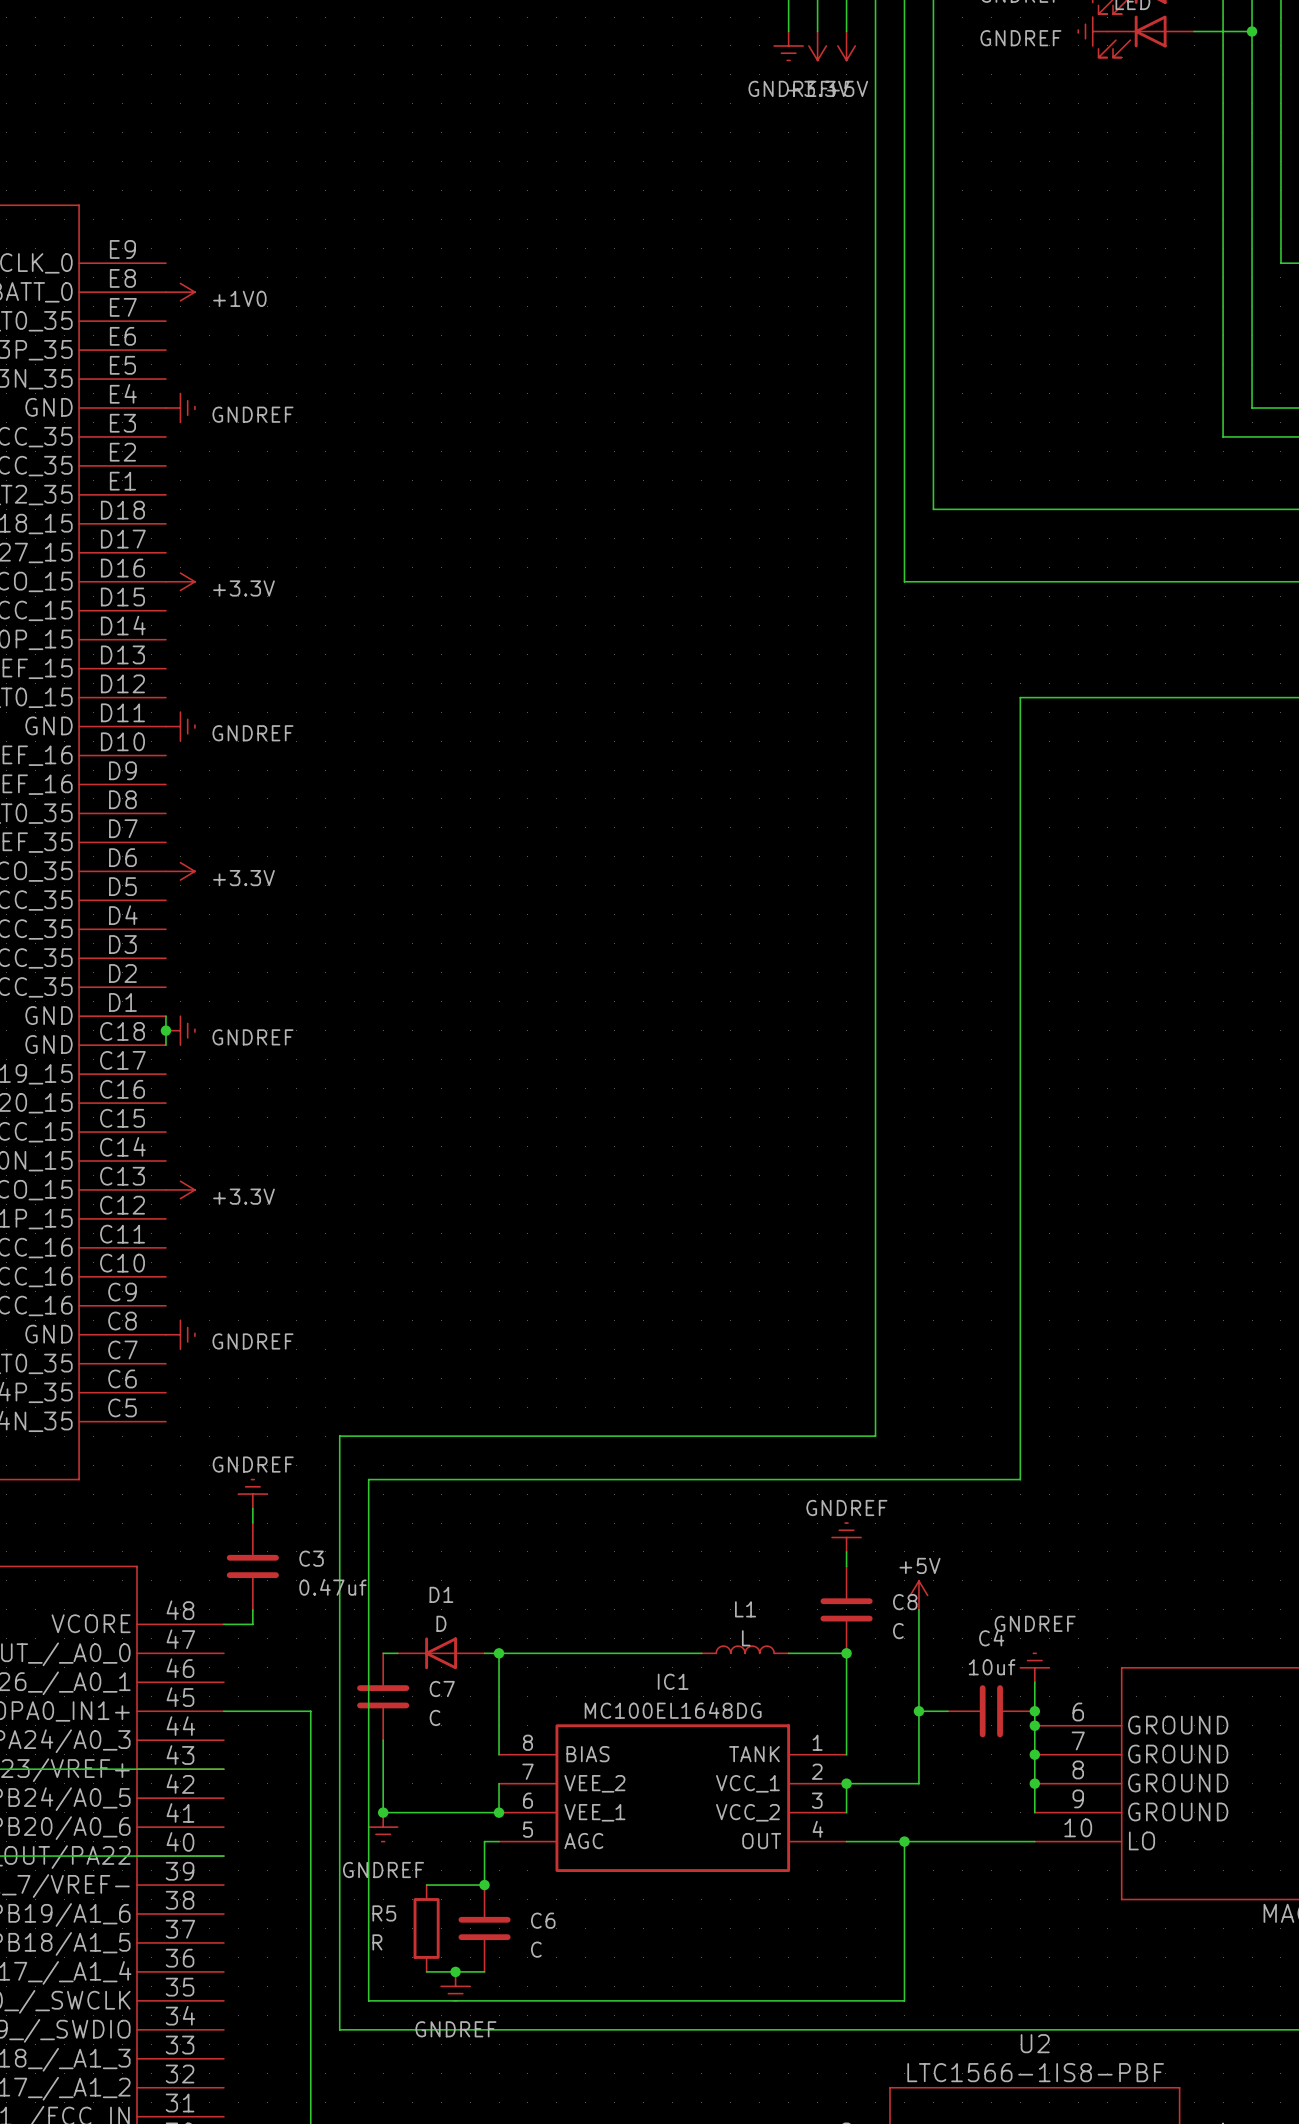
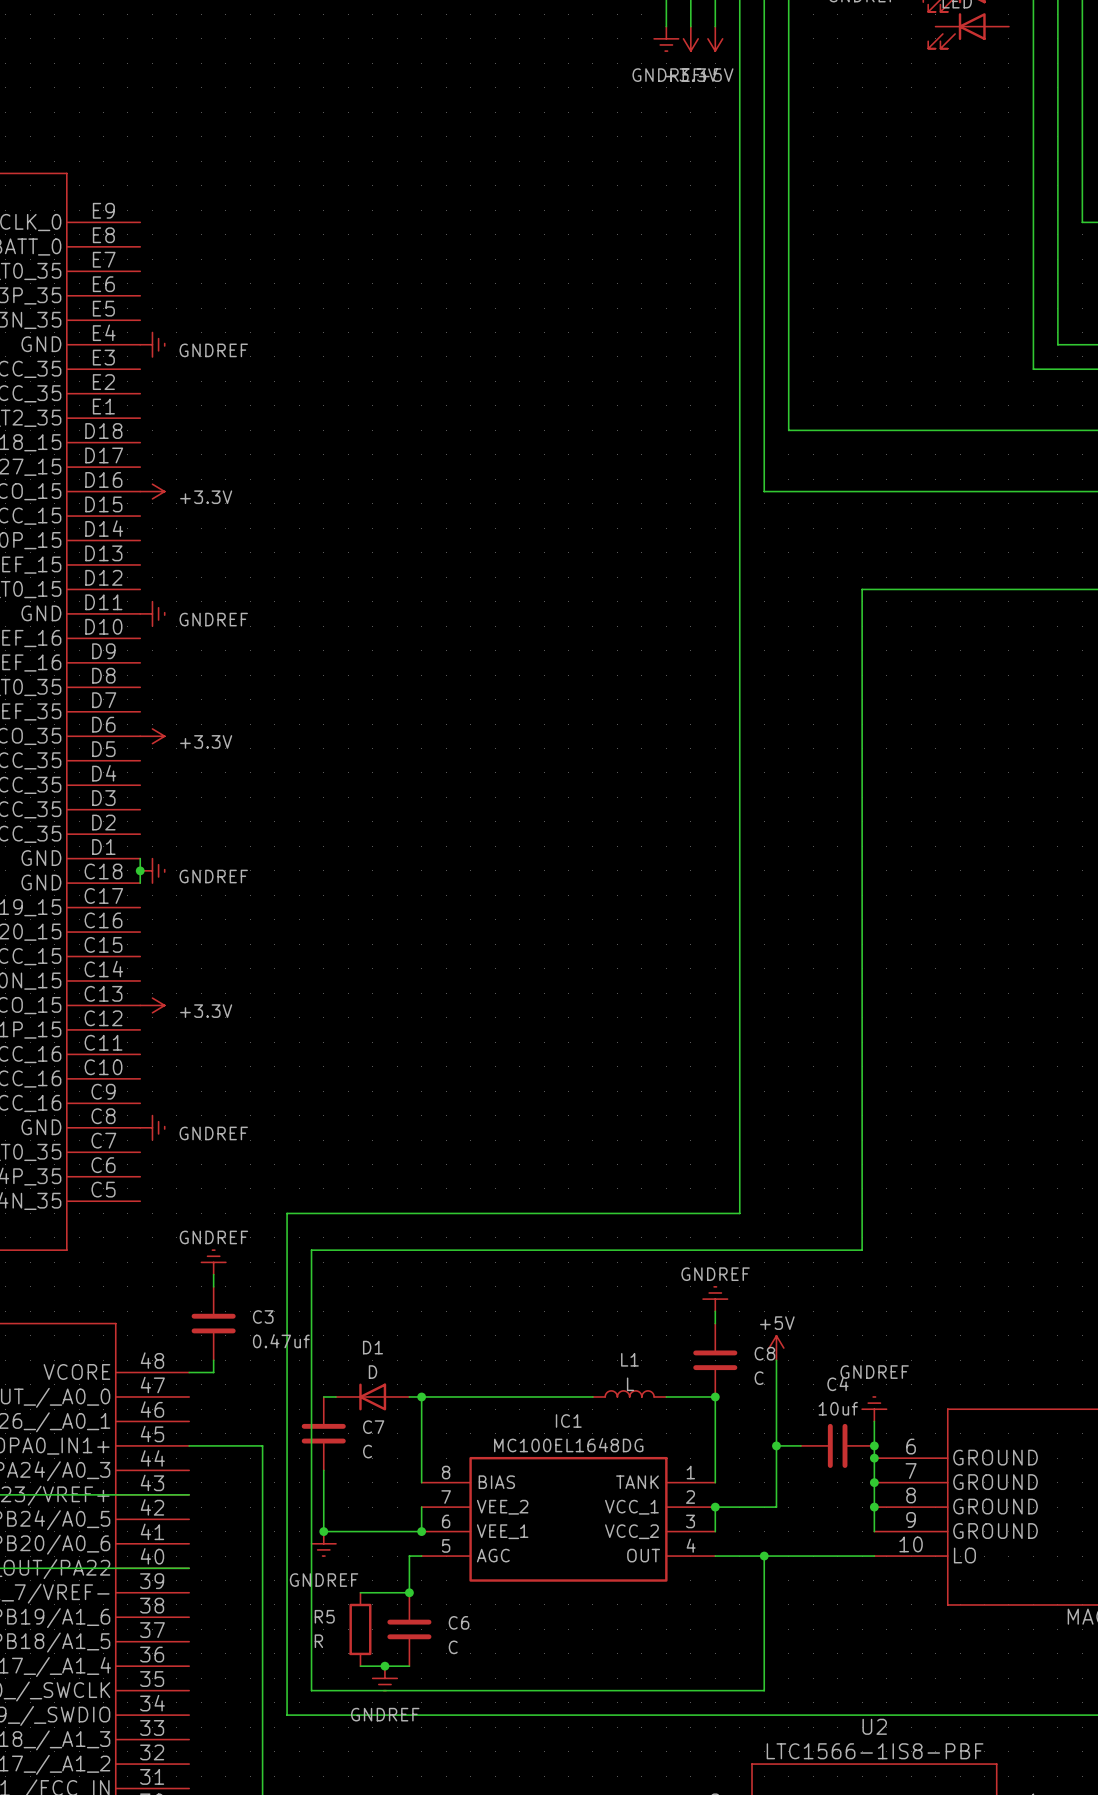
power symbol: GNDREF (1092, 31) -> none
wire: (1194, 31) (1252, 31) -> none
junction: (1252, 31) -> none
power symbol: +1V0 (180, 292) -> none

